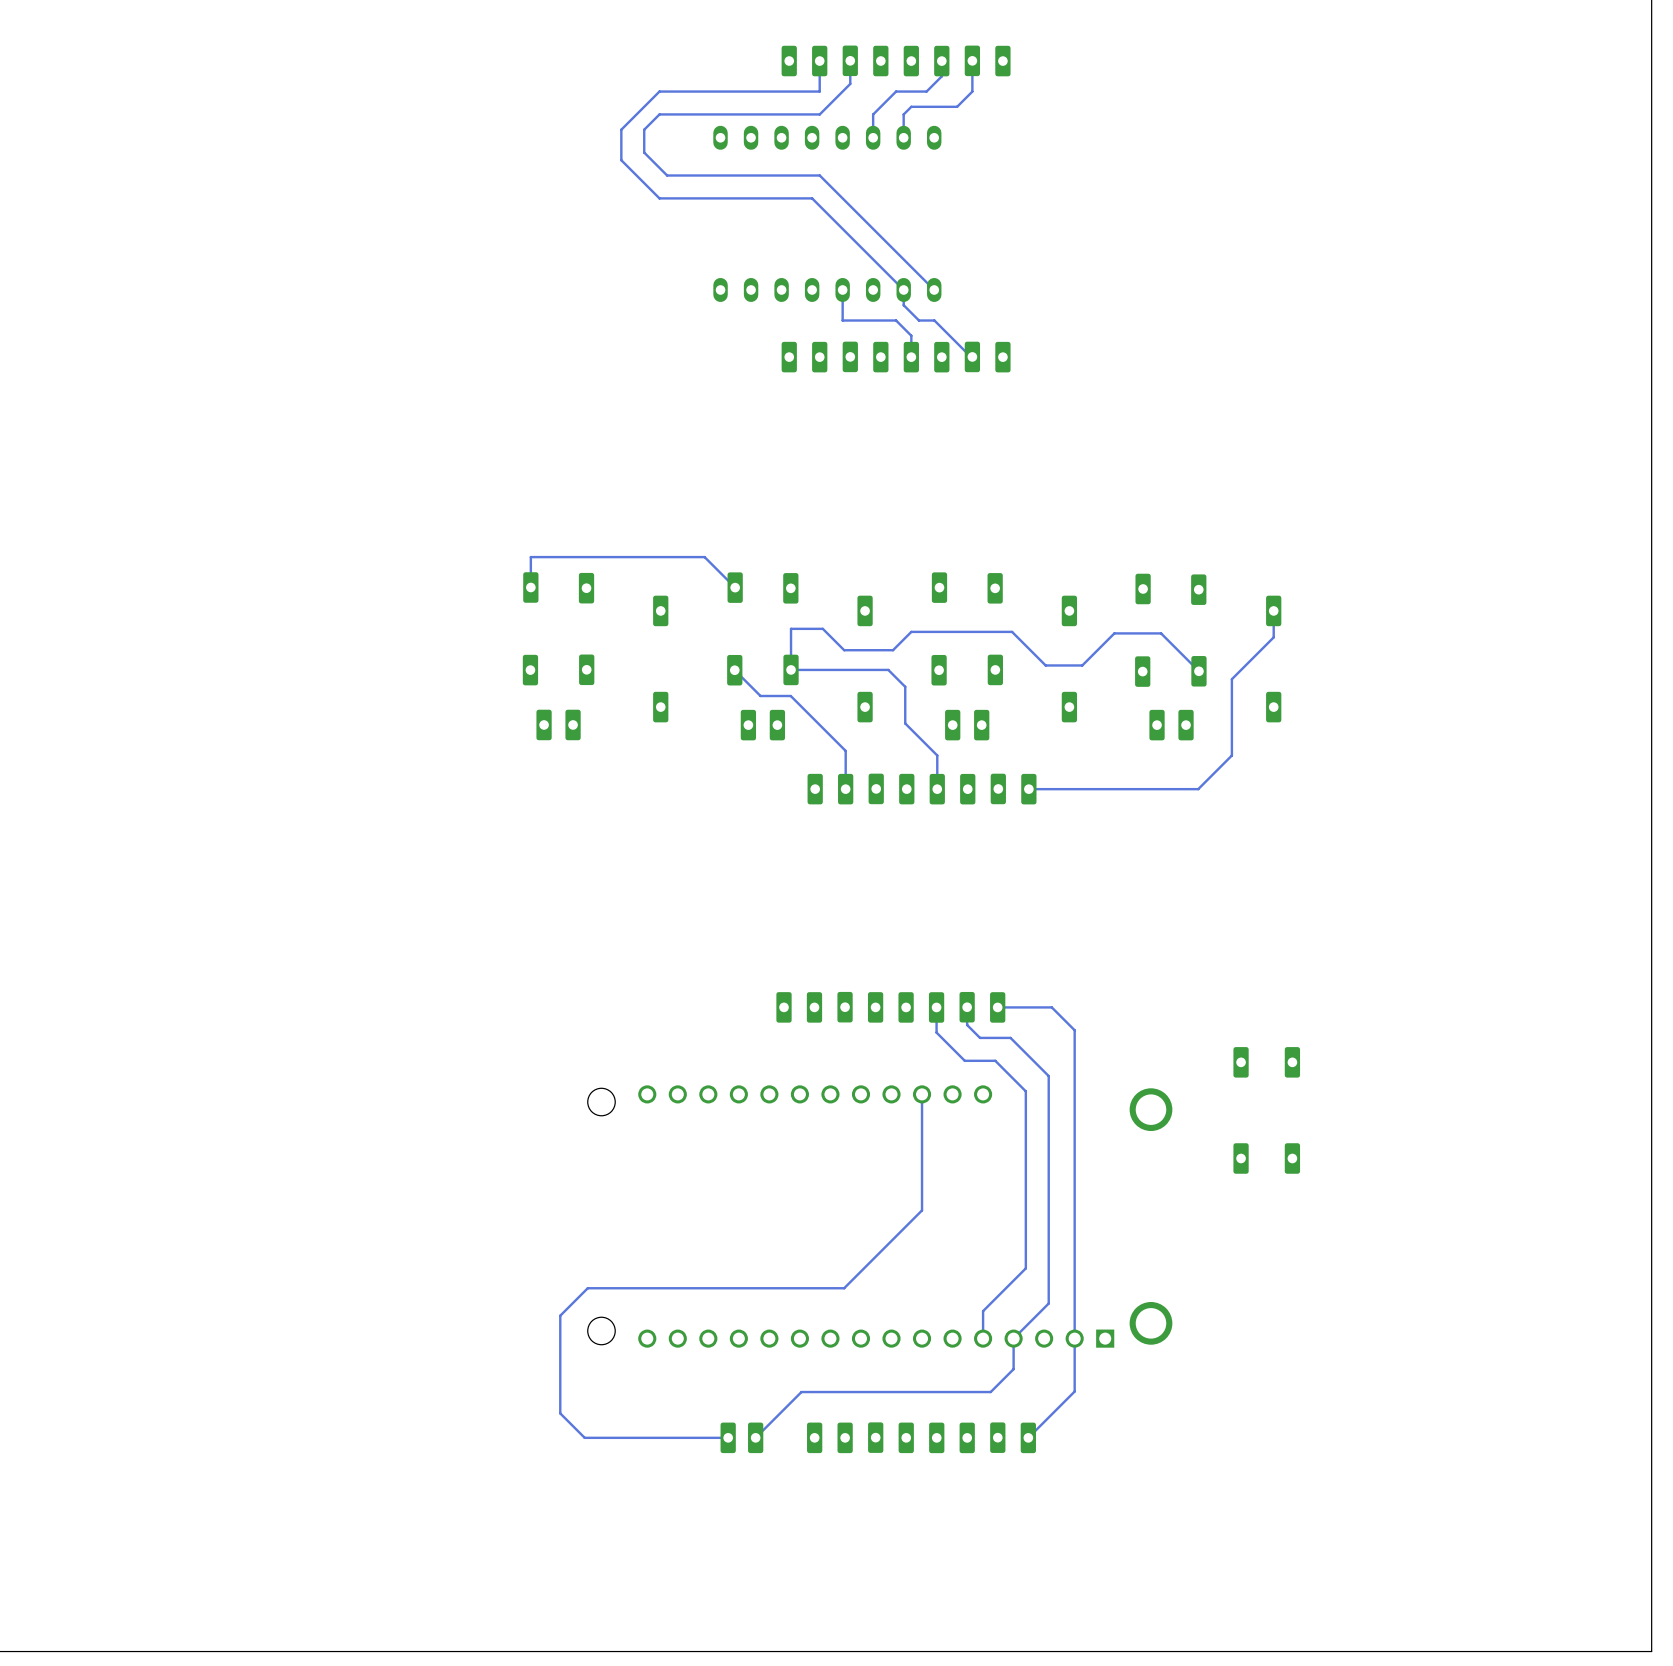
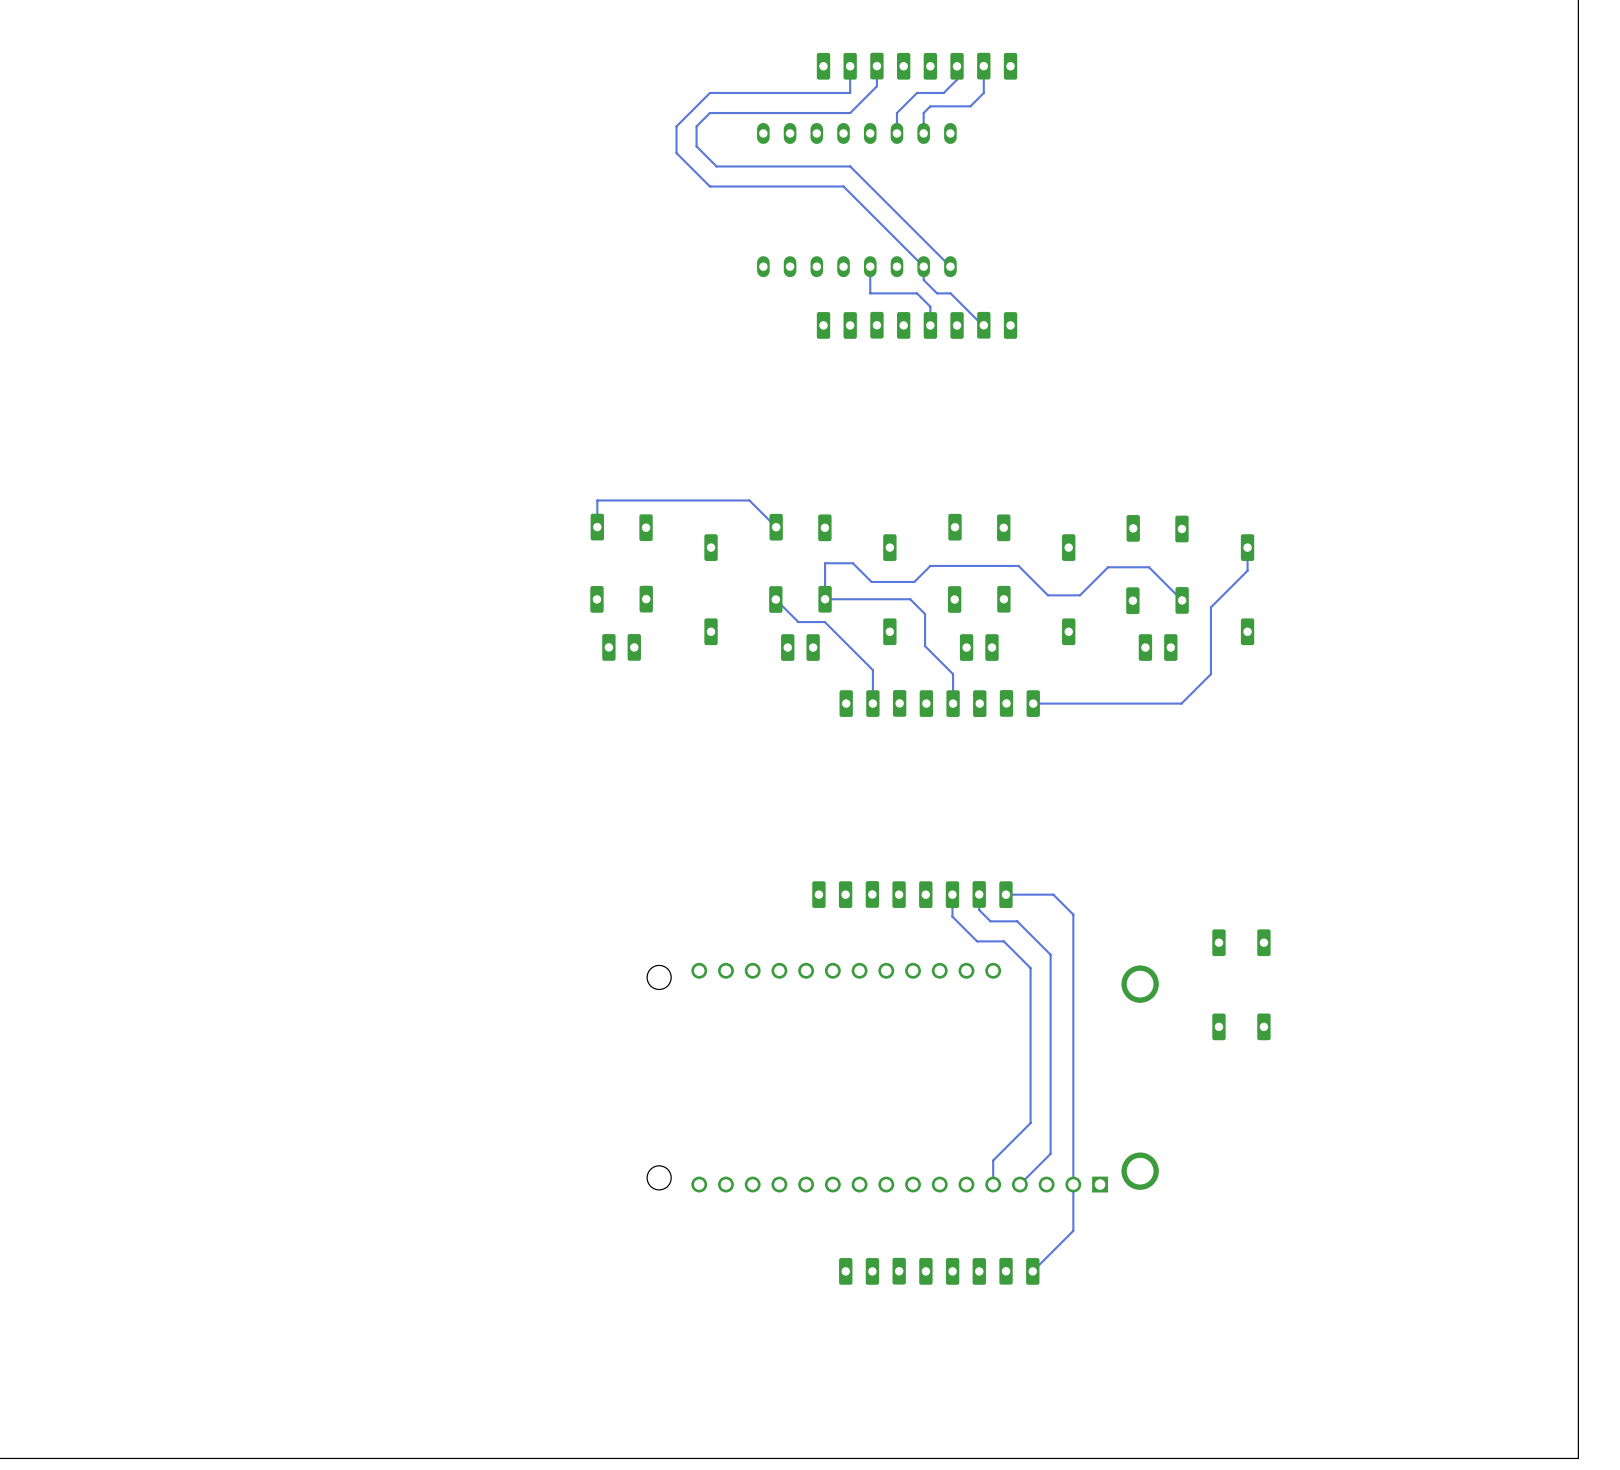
track: (922, 1094) (922, 1210) (844, 1288) (587, 1288) (560, 1315) (560, 1413) (584, 1437) (728, 1437) -> none
track: (1013, 1338) (1013, 1369) (990, 1392) (801, 1392) (755, 1437) -> none
part: (728, 1437) -> none
part: (755, 1437) -> none

